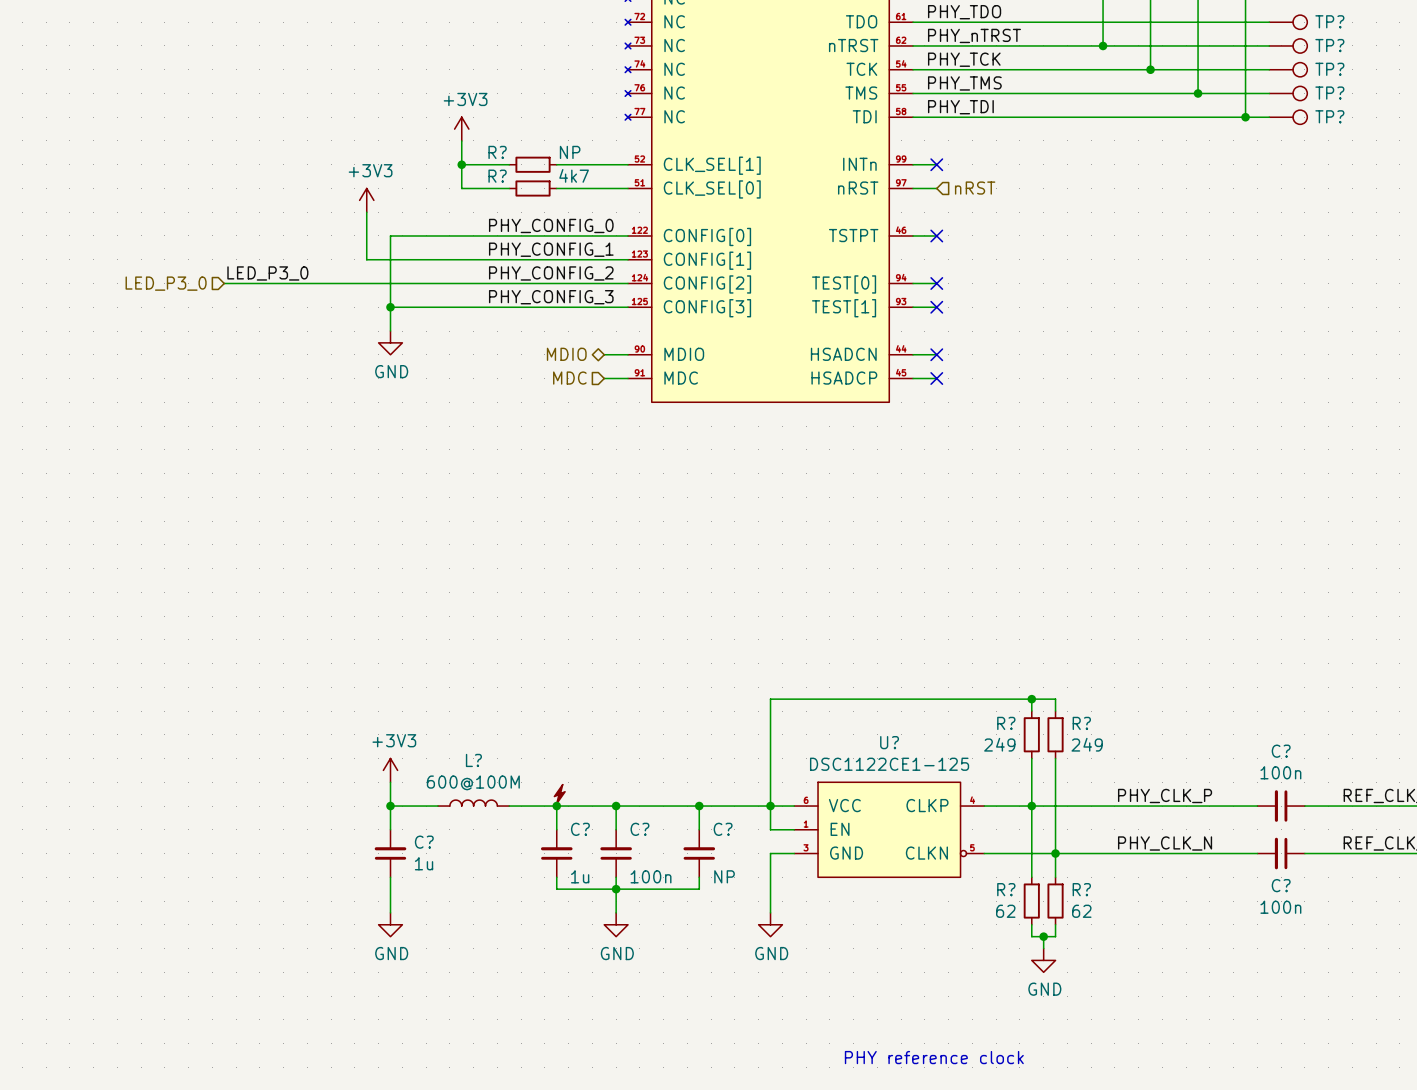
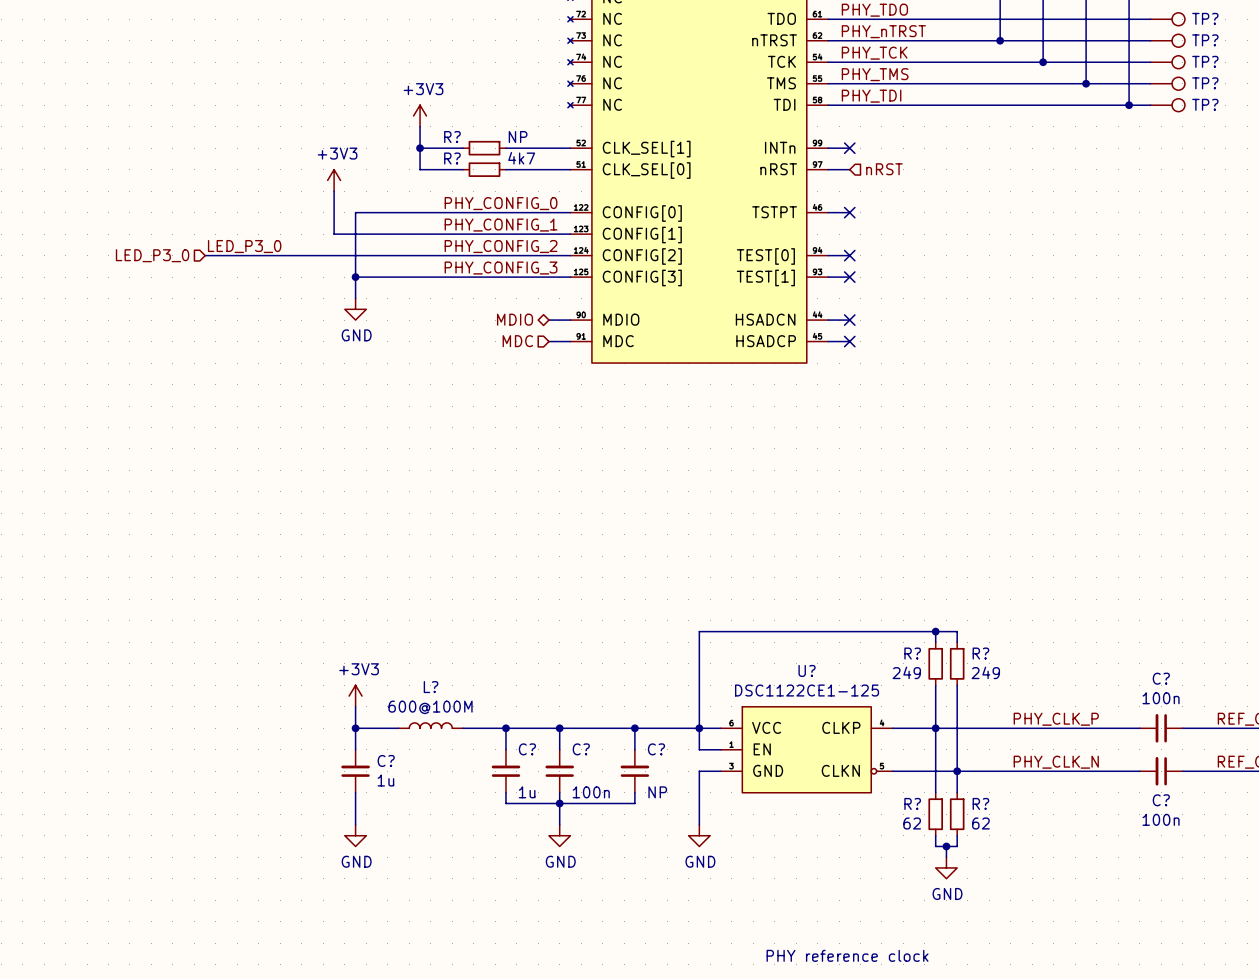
power symbol: (559, 794) -> none

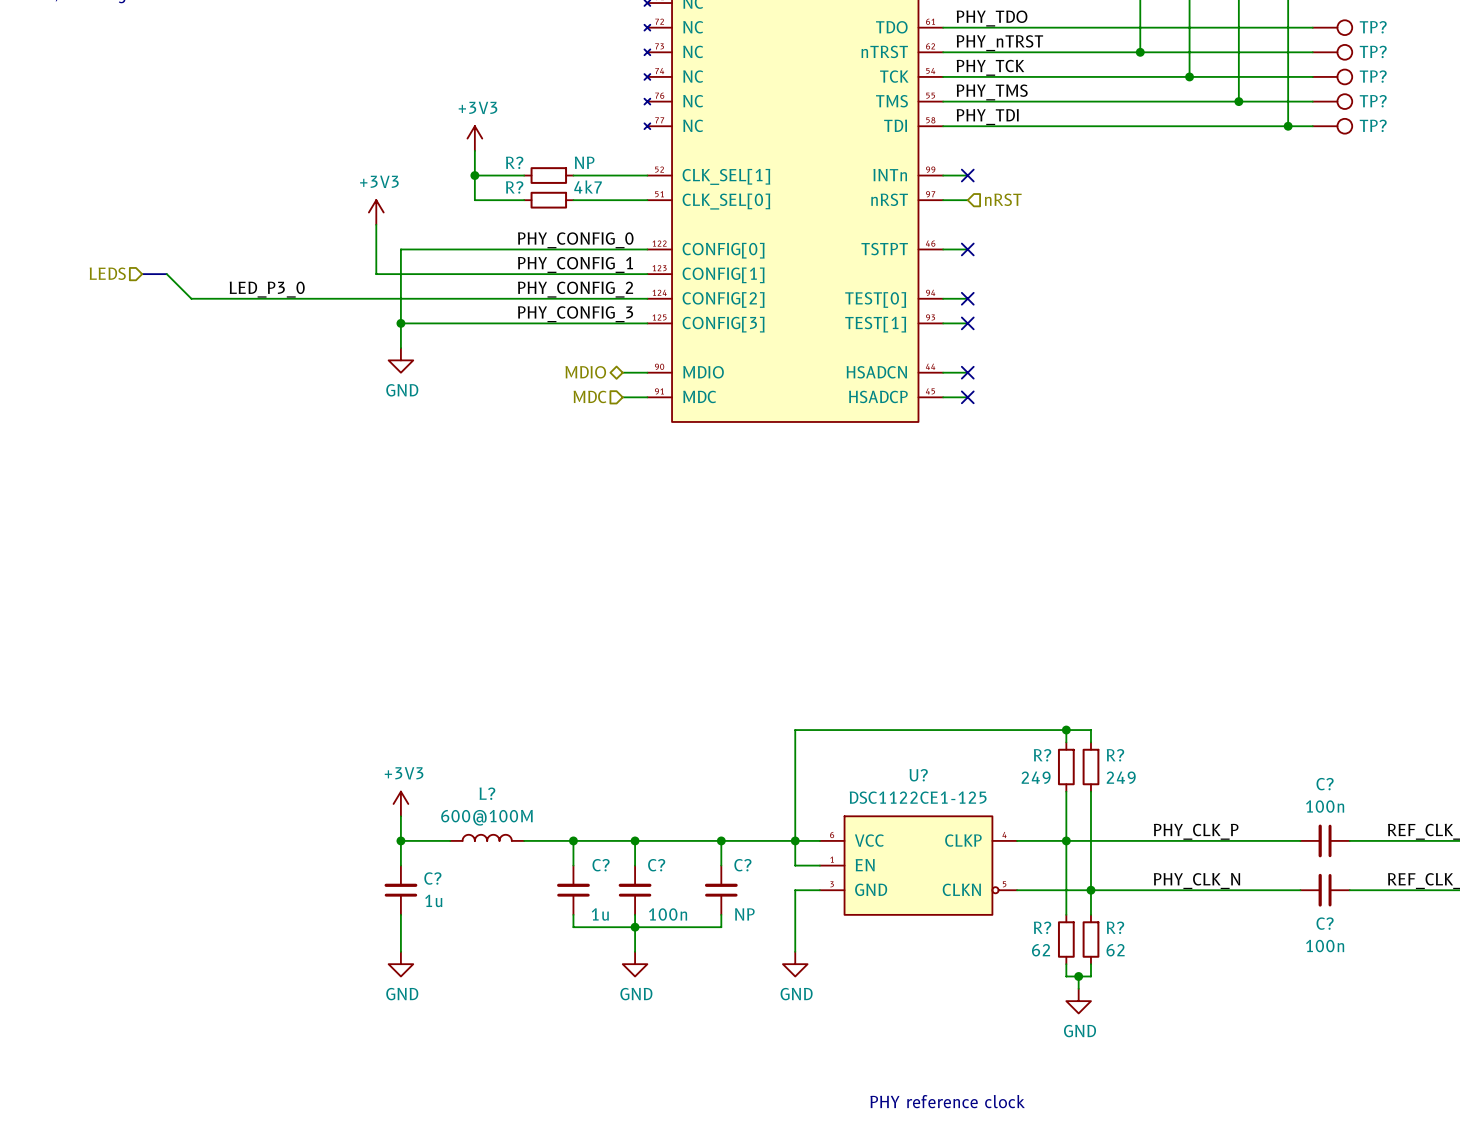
hierarchical label: none -> LEDS (107, 273)
bus: none -> (142, 274) (166, 274)
wire: none -> (166, 274) (191, 298) (228, 298)
hierarchical label: LED_P3_0 (152, 255) -> none

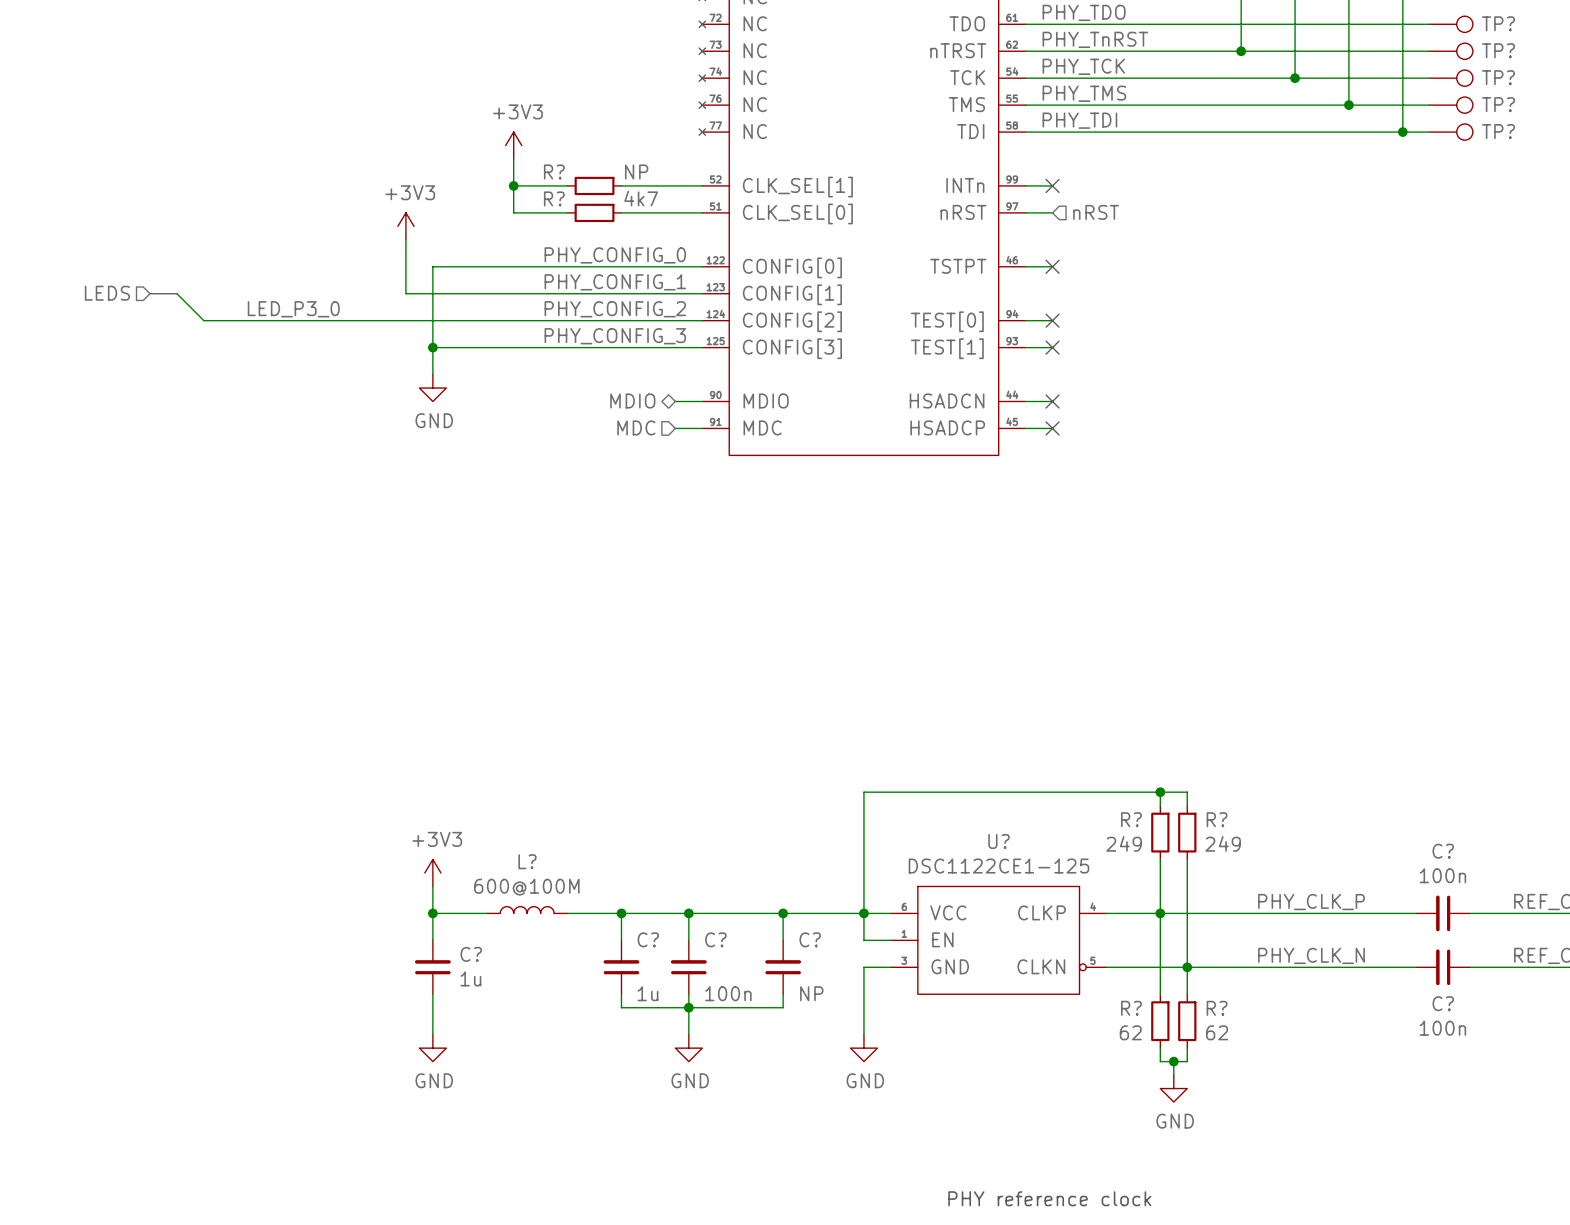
label: PHY_nTRST (999, 43) -> PHY_TnRST (1095, 39)

